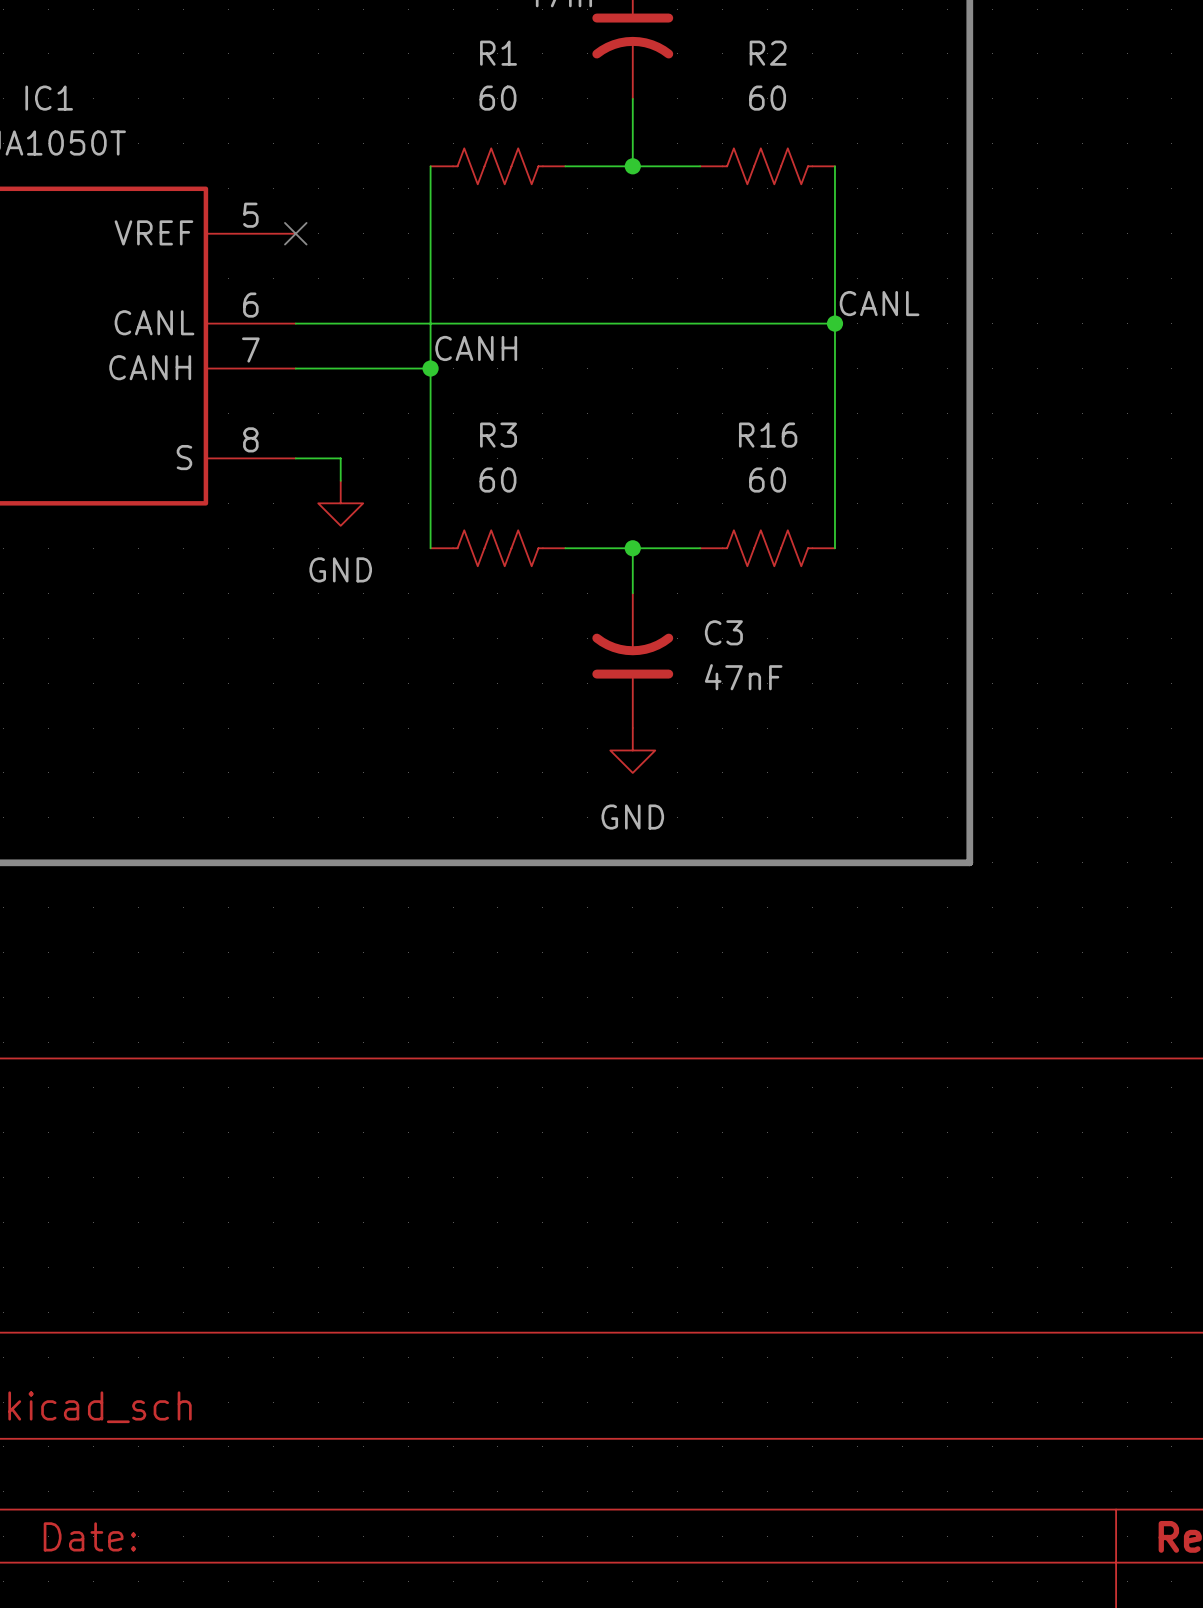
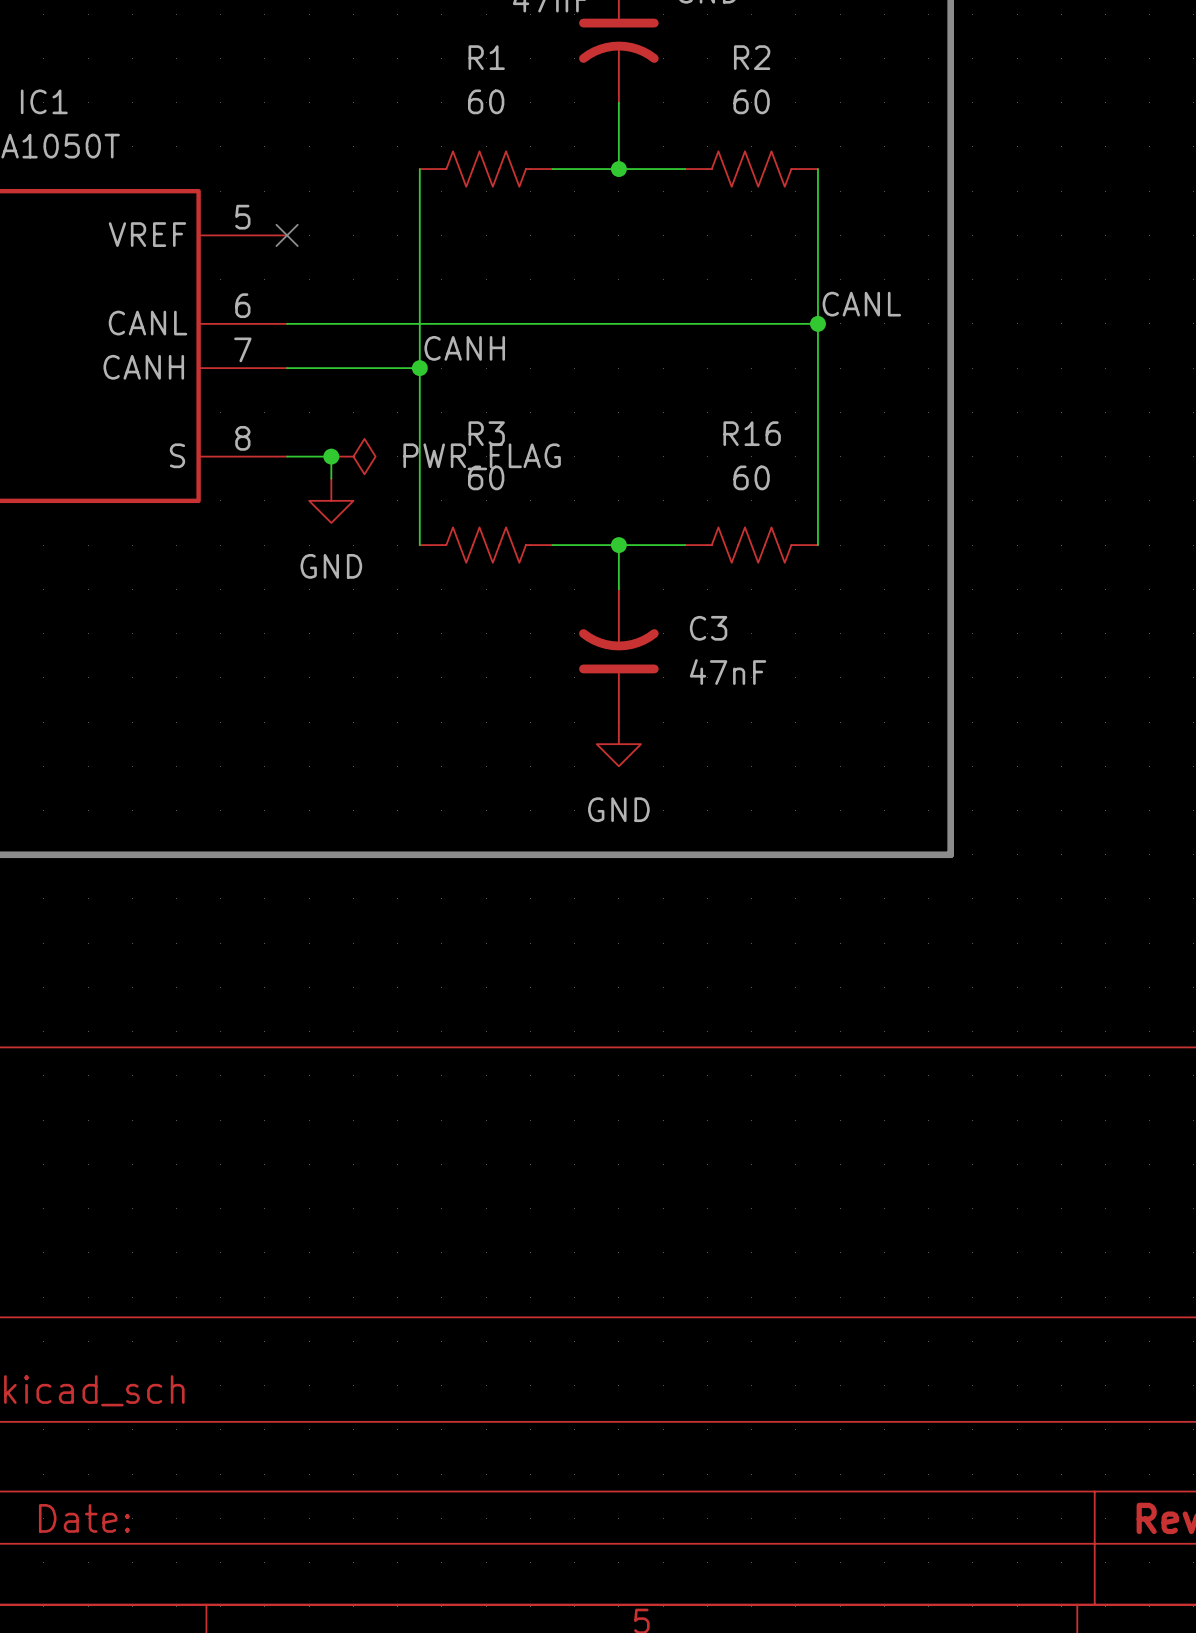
junction: none -> (331, 456)
power symbol: none -> PWR_FLAG (353, 456)

